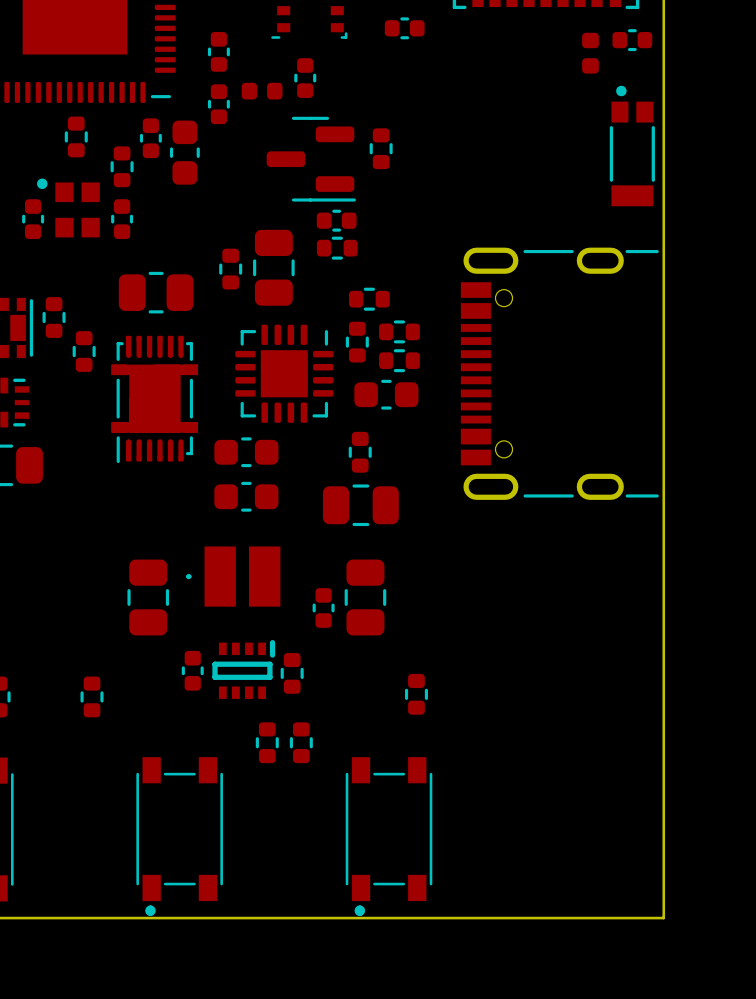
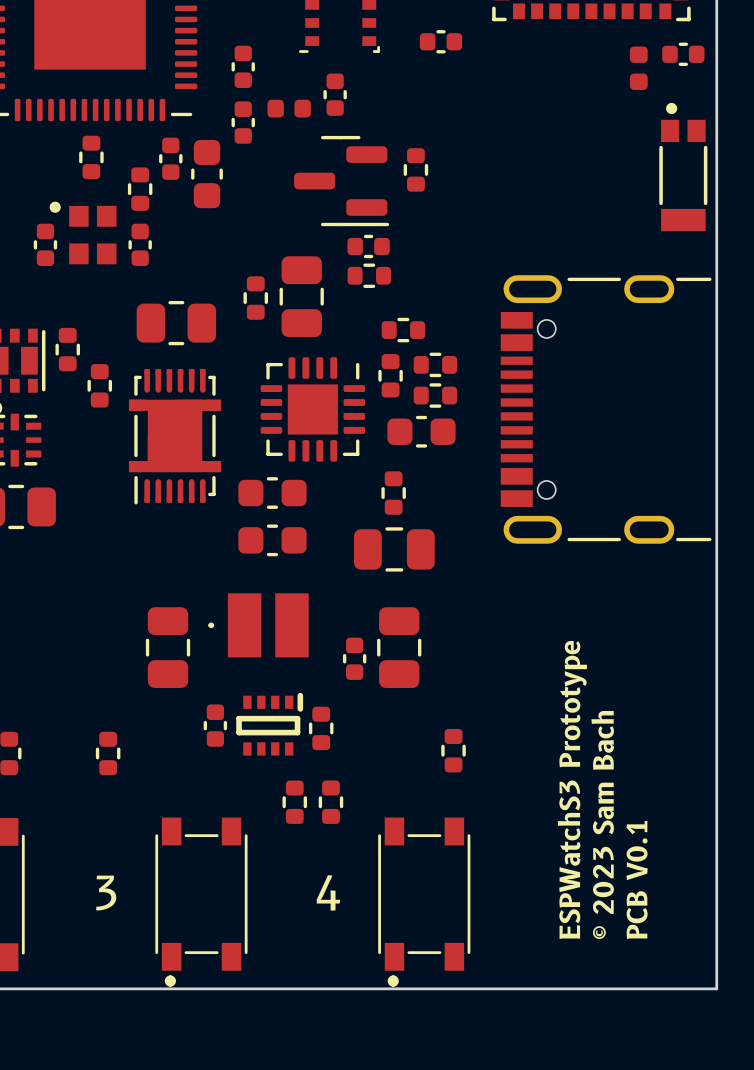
text: none -> ESPWatchS3 Prototype (572, 789)
text: none -> © 2023 Sam Bach (602, 824)
text: none -> PCB V0.1 (637, 880)
part value: none -> 3 (106, 893)
part value: none -> 4 (328, 892)

